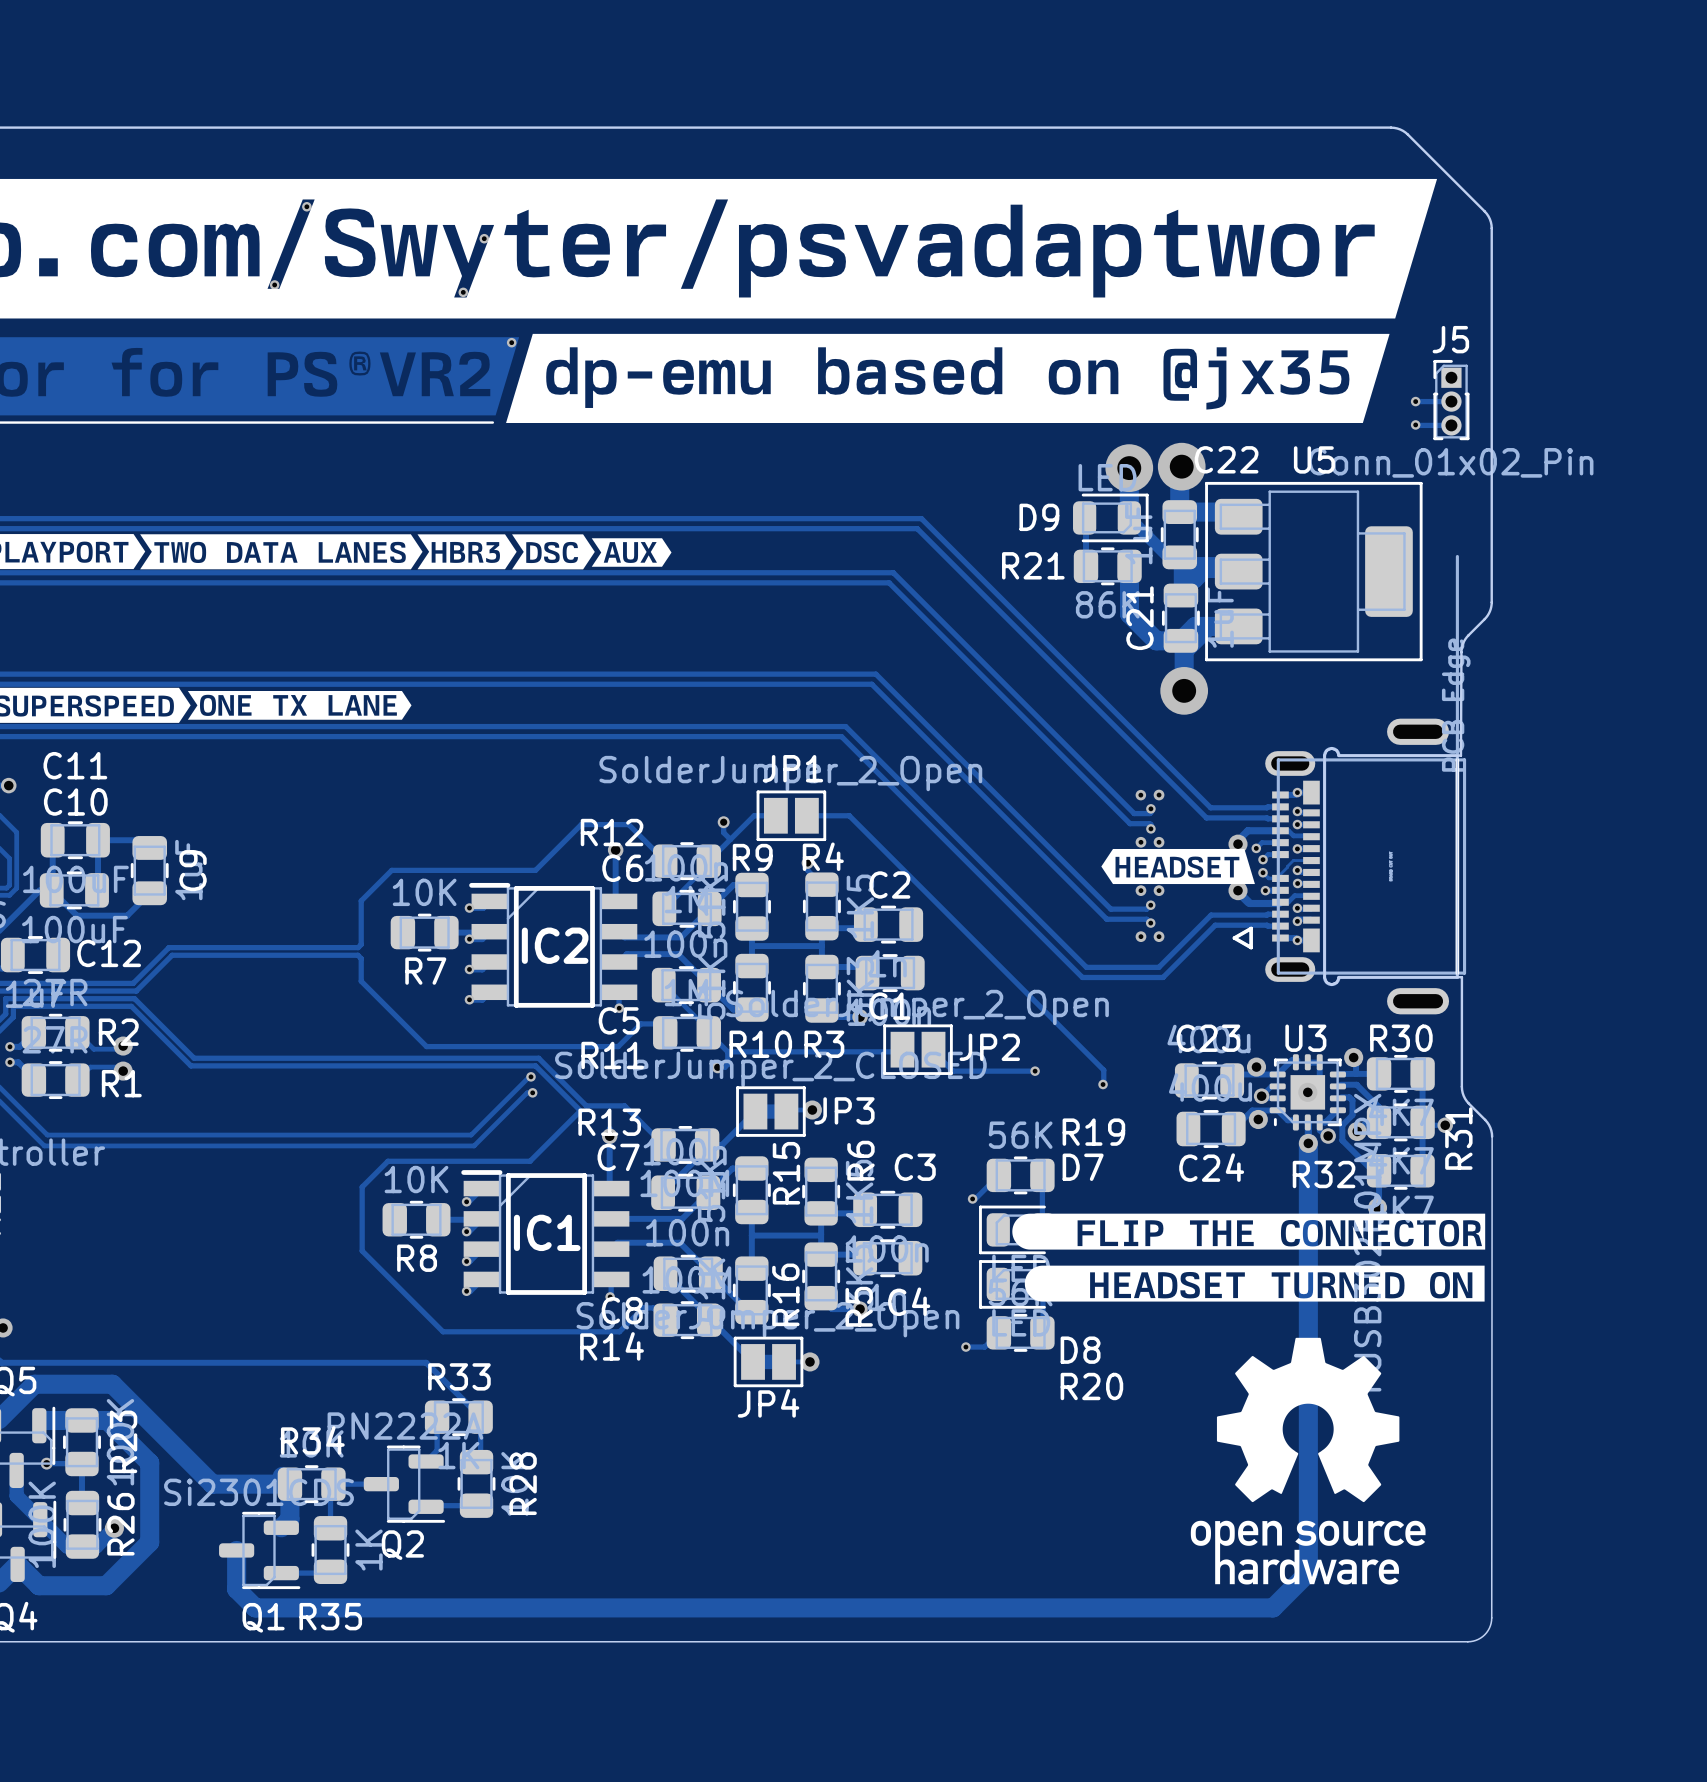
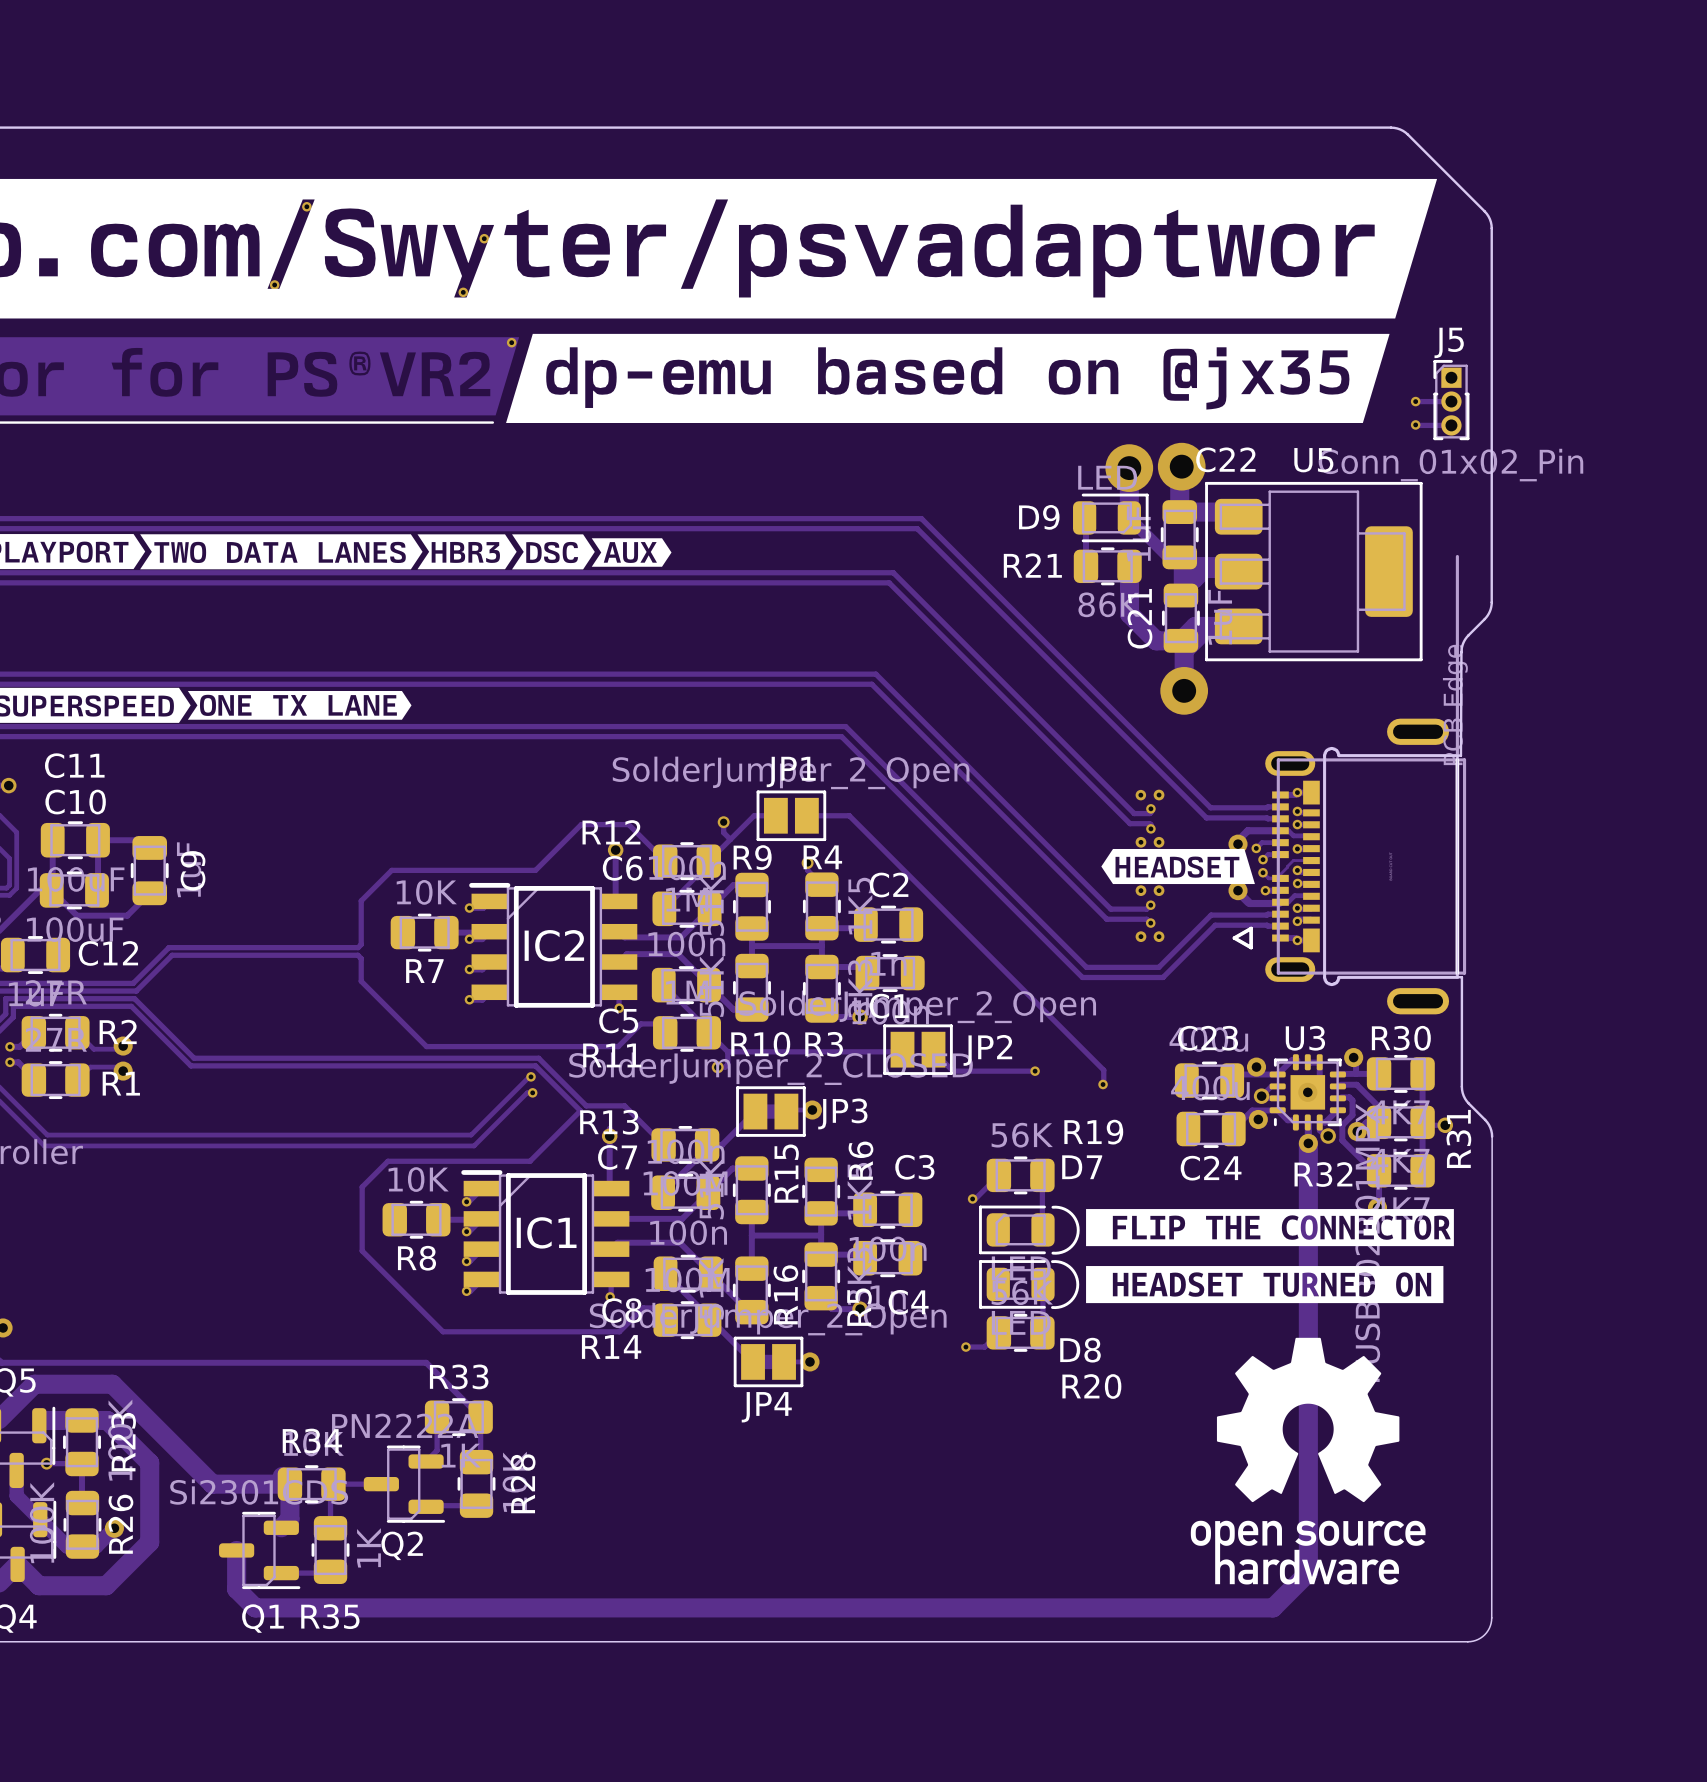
line: none -> (1052, 1207) (1064, 1209) (1071, 1214) (1076, 1221) (1078, 1230) (1076, 1238) (1069, 1248) (1061, 1252) (1052, 1253)
drawing shape: [1012, 1213, 1486, 1250] -> [1086, 1209, 1454, 1247]
line: none -> (1052, 1261) (1061, 1262) (1069, 1266) (1074, 1273) (1077, 1284) (1076, 1293) (1071, 1300) (1064, 1305) (1052, 1307)
drawing shape: [1024, 1265, 1485, 1302] -> [1086, 1266, 1444, 1304]

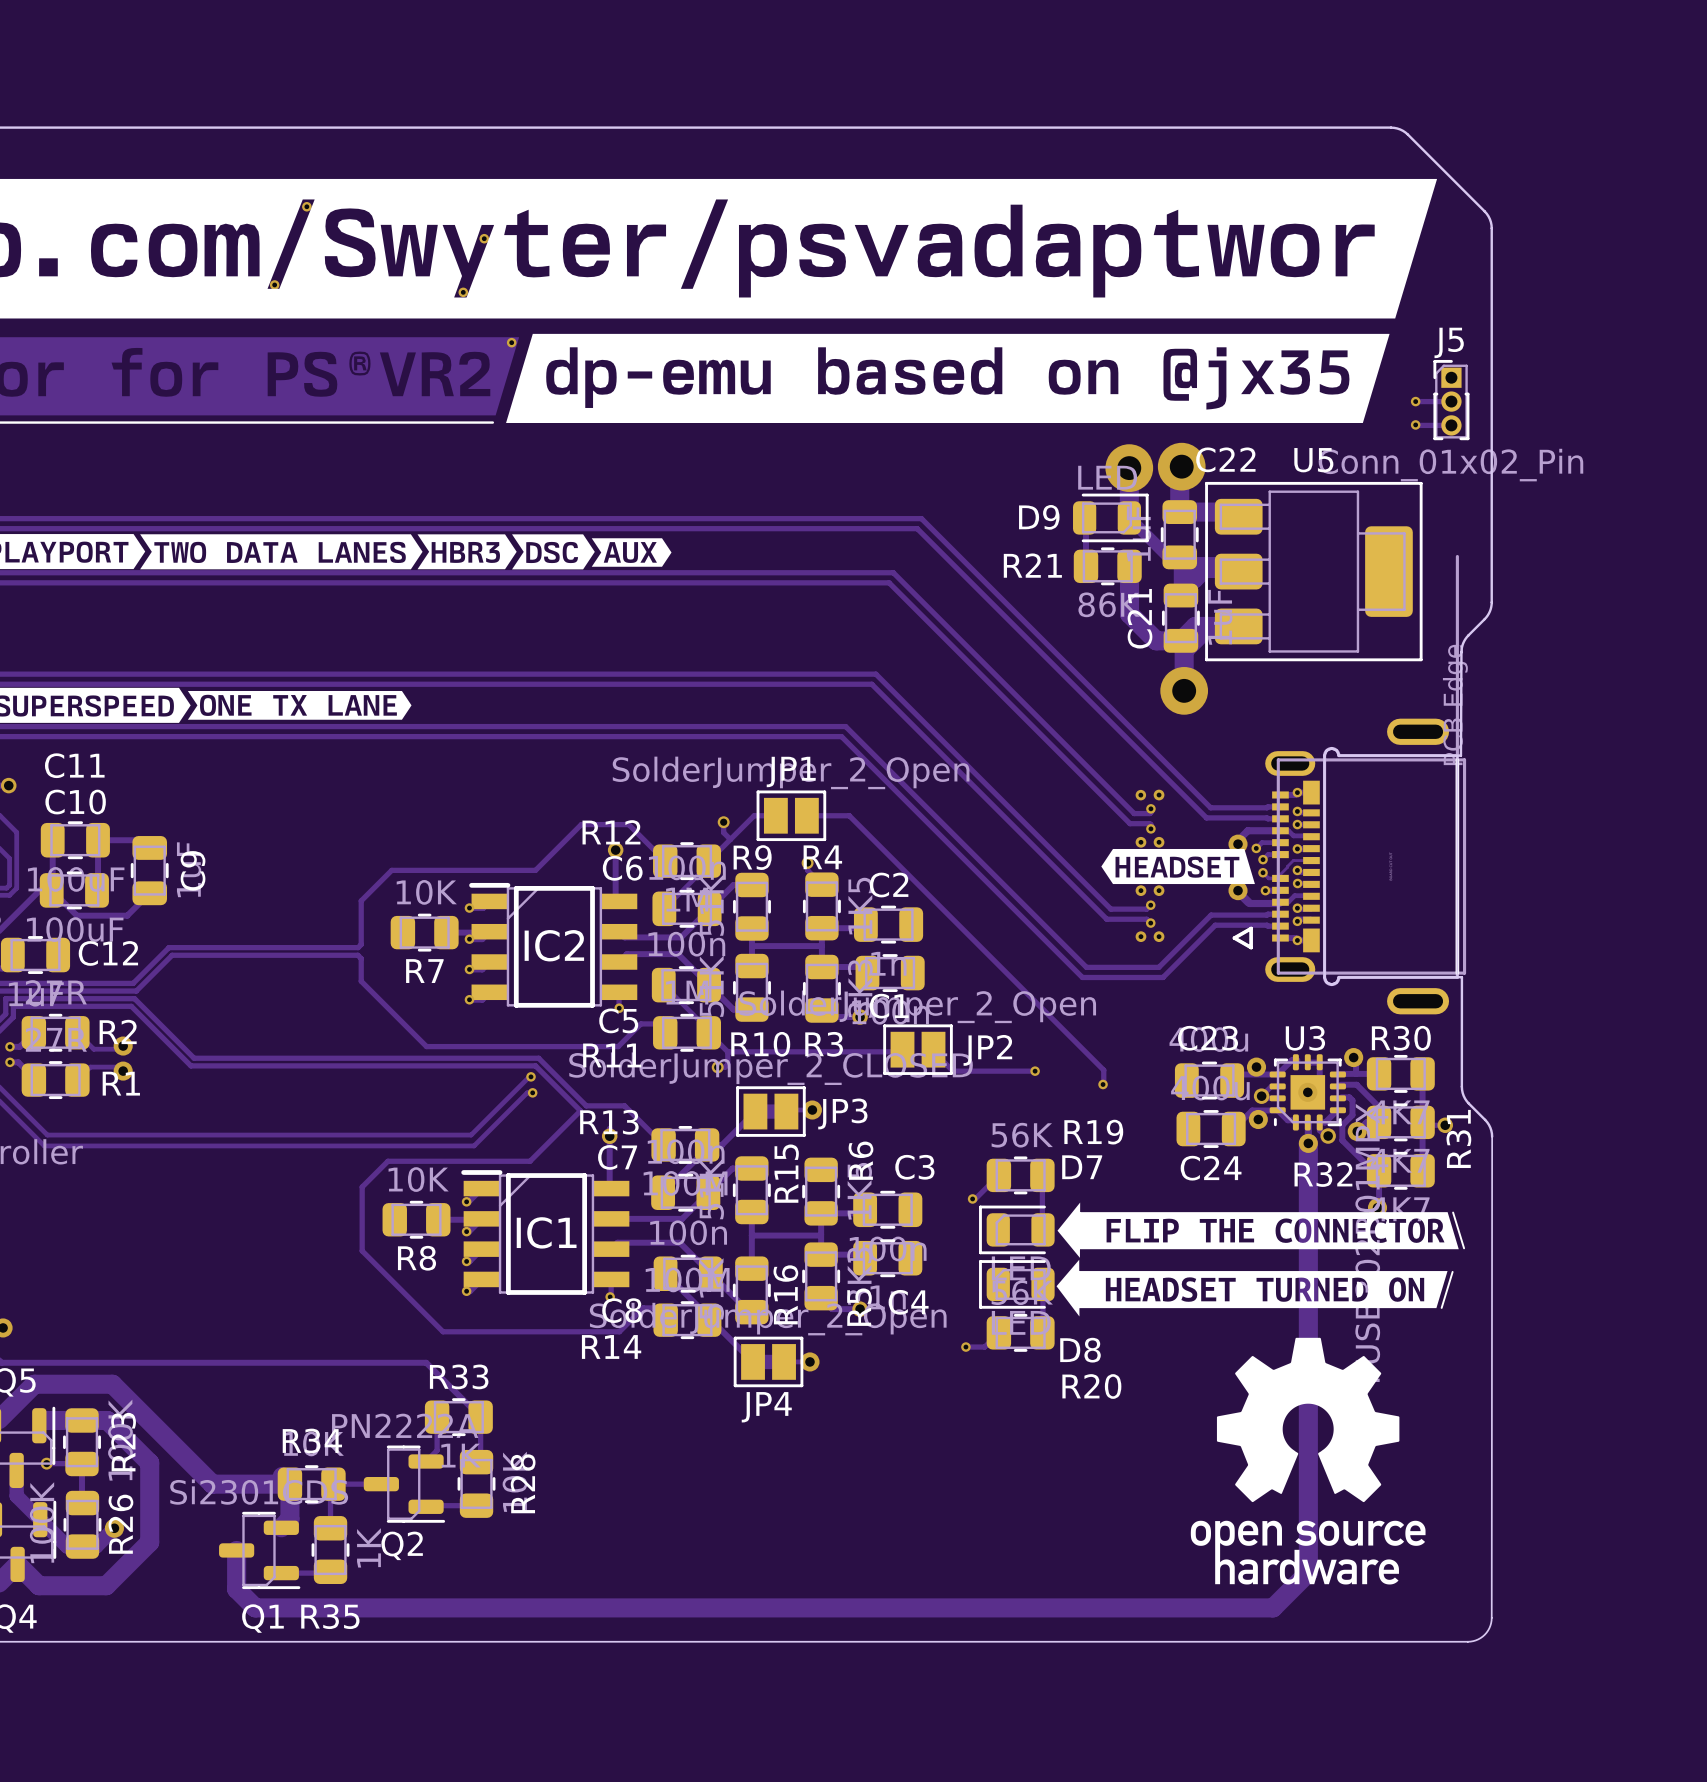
drawing: none -> [1056, 1202, 1081, 1317]
line: (1052, 1207) (1064, 1209) (1071, 1214) (1076, 1221) (1078, 1230) (1076, 1238) (1069, 1248) (1061, 1252) (1052, 1253) -> none
drawing shape: [1086, 1209, 1454, 1247] -> [1079, 1212, 1459, 1250]
line: none -> (1453, 1212) (1464, 1248)
line: (1052, 1261) (1061, 1262) (1069, 1266) (1074, 1273) (1077, 1284) (1076, 1293) (1071, 1300) (1064, 1305) (1052, 1307) -> none
drawing shape: [1086, 1266, 1444, 1304] -> [1079, 1271, 1448, 1309]
line: none -> (1452, 1271) (1441, 1307)

